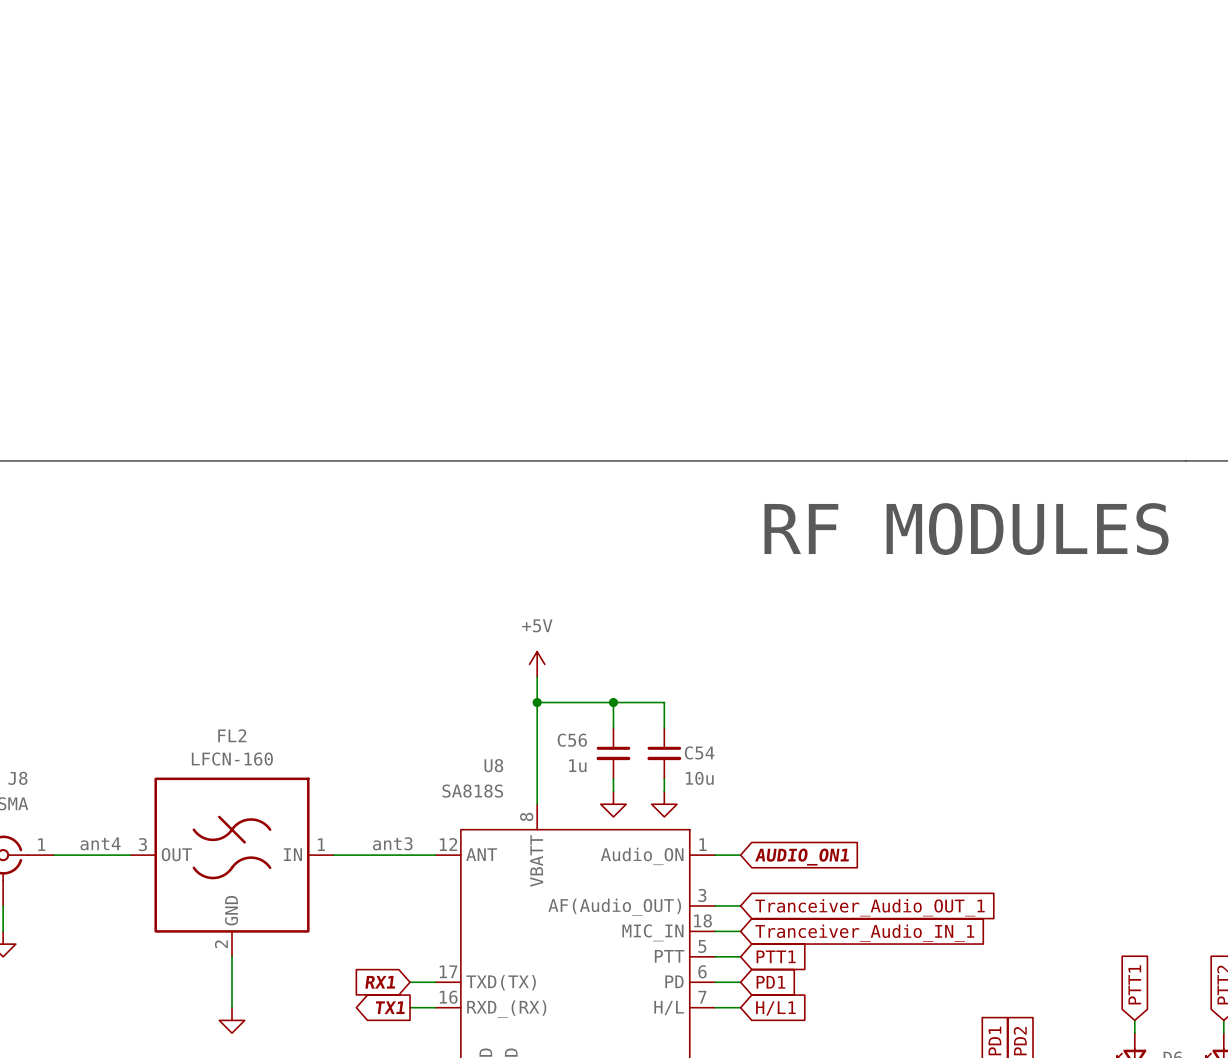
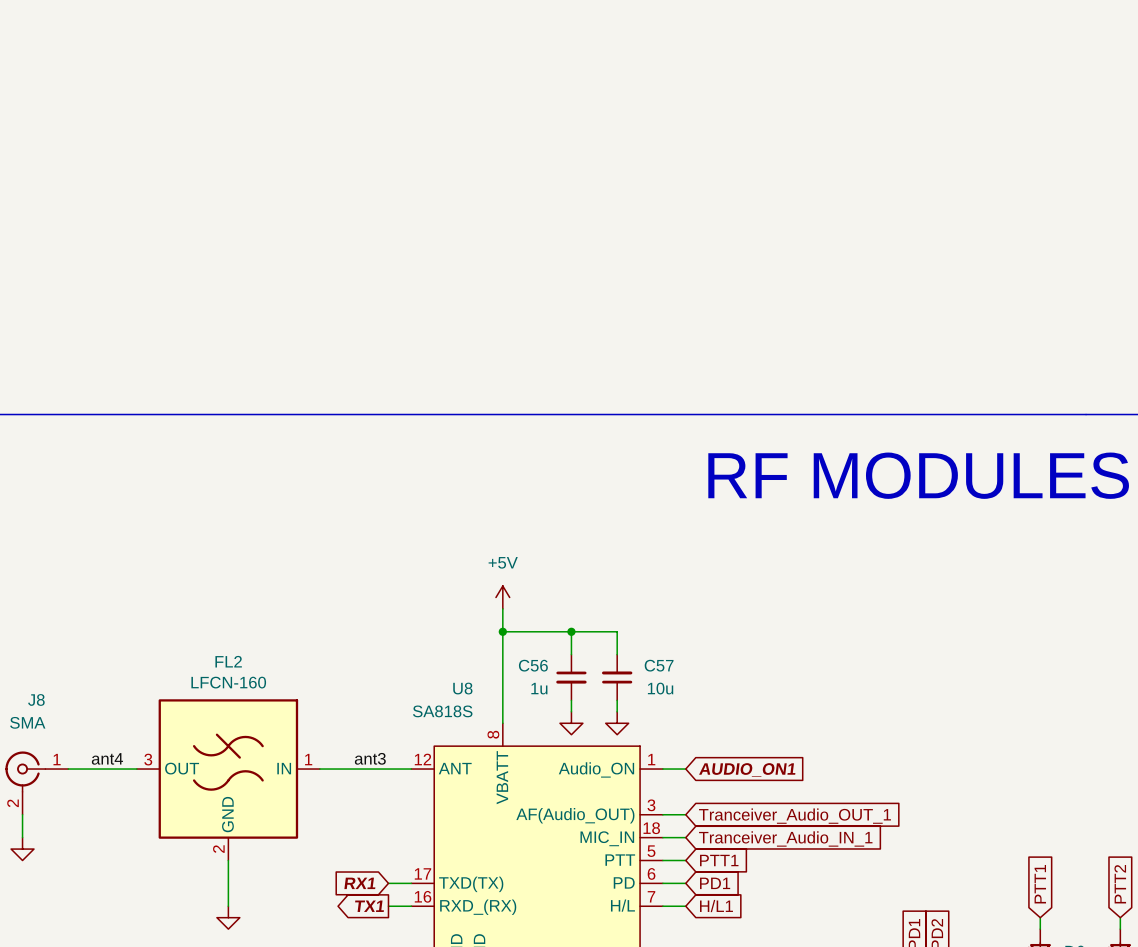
C54: 10u (664, 753) -> none
C57: none -> 10u (617, 677)

